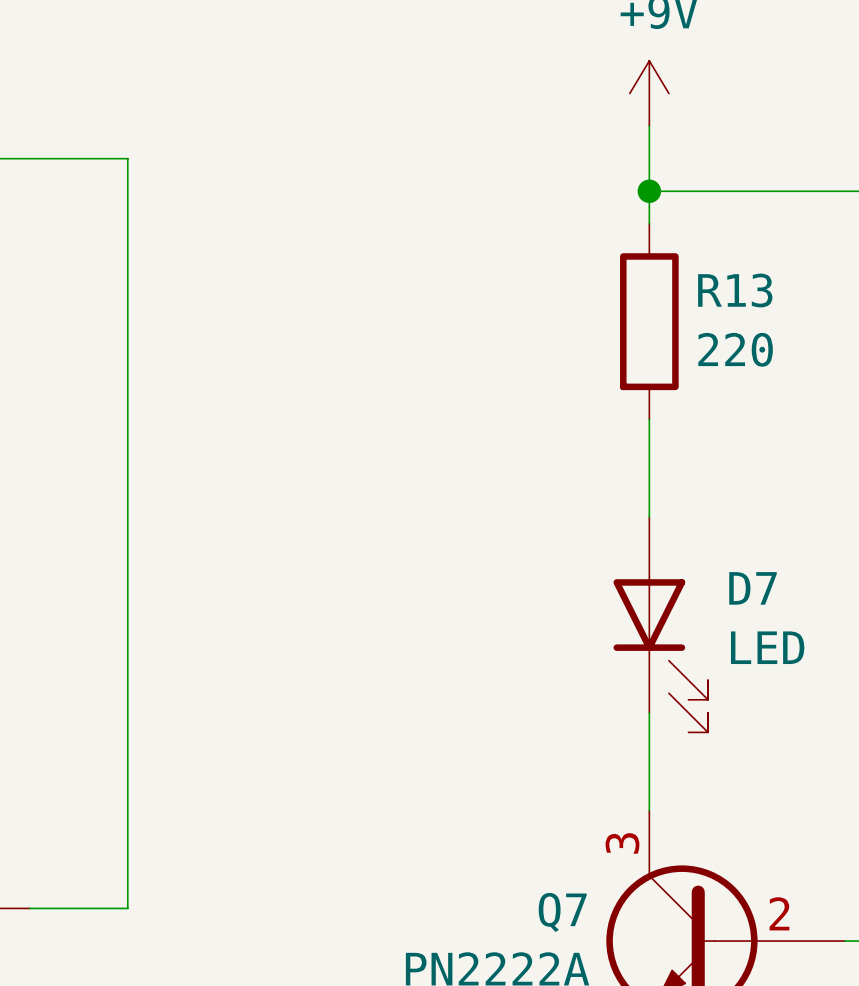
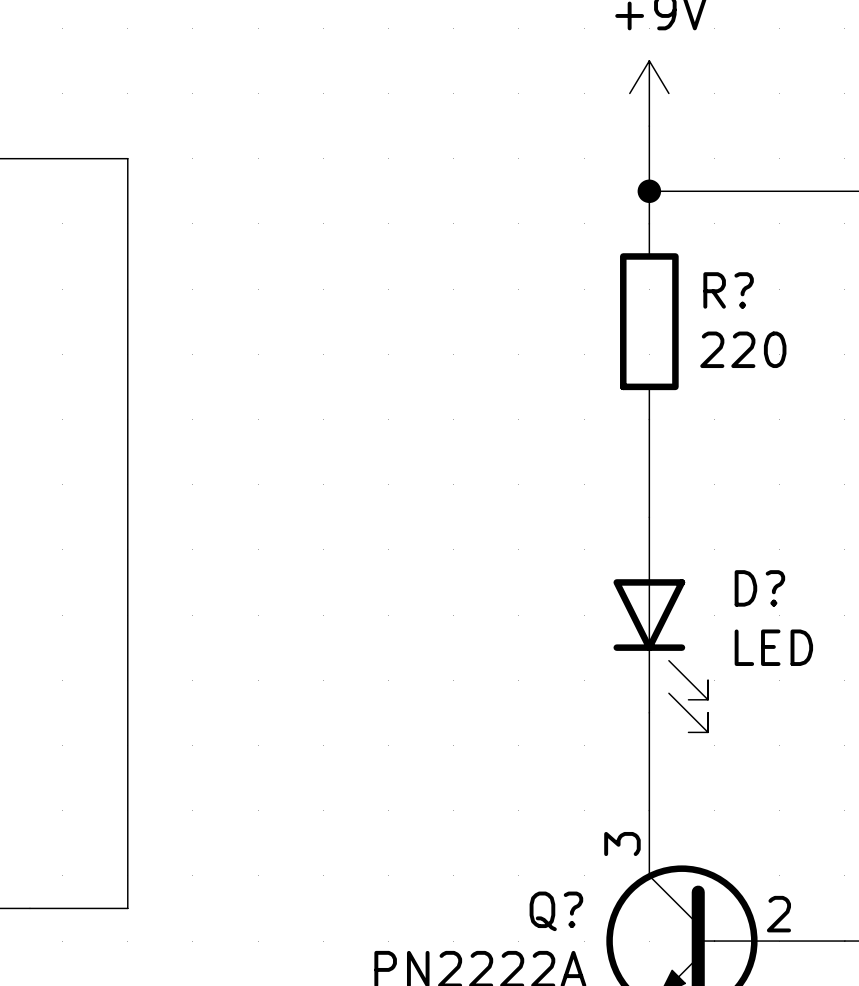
R13 name: R13 (735, 290) -> R? (728, 290)
D7 name: D7 (753, 588) -> D? (759, 588)
Q7 name: Q7 (562, 912) -> Q? (556, 911)

